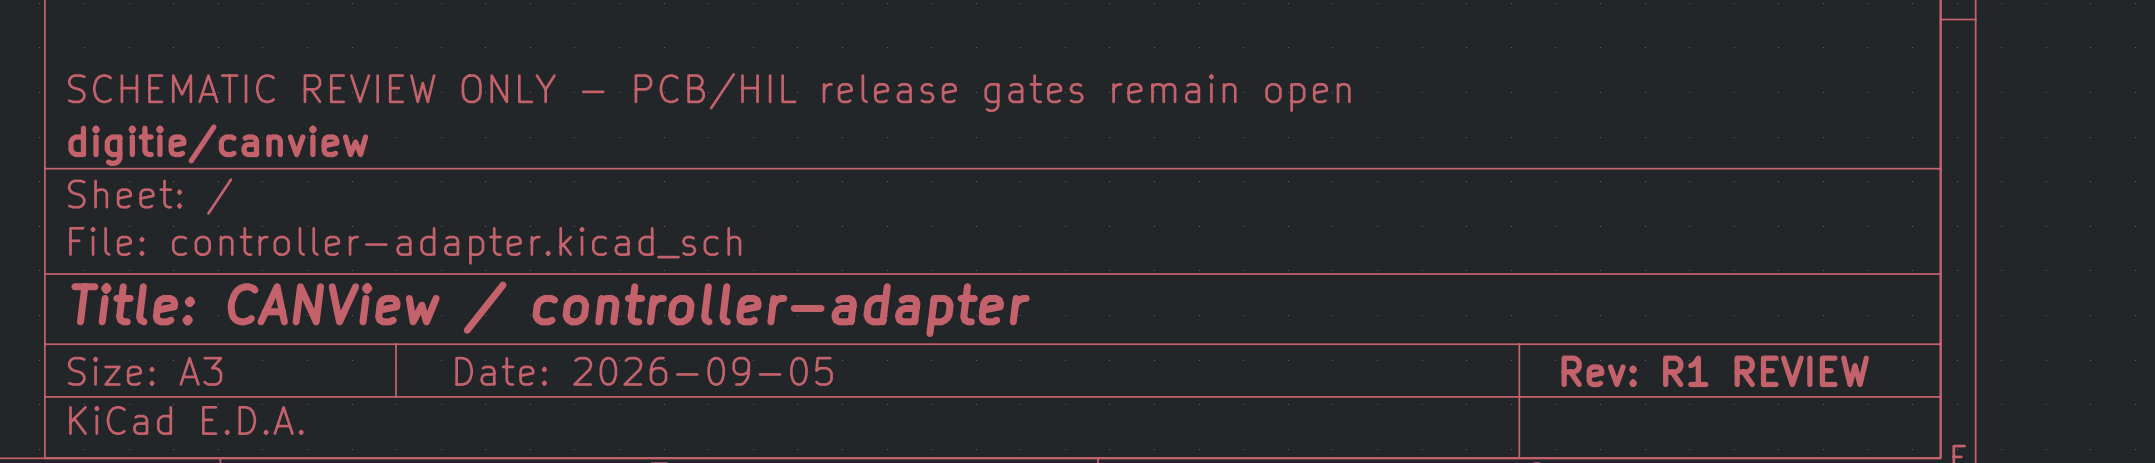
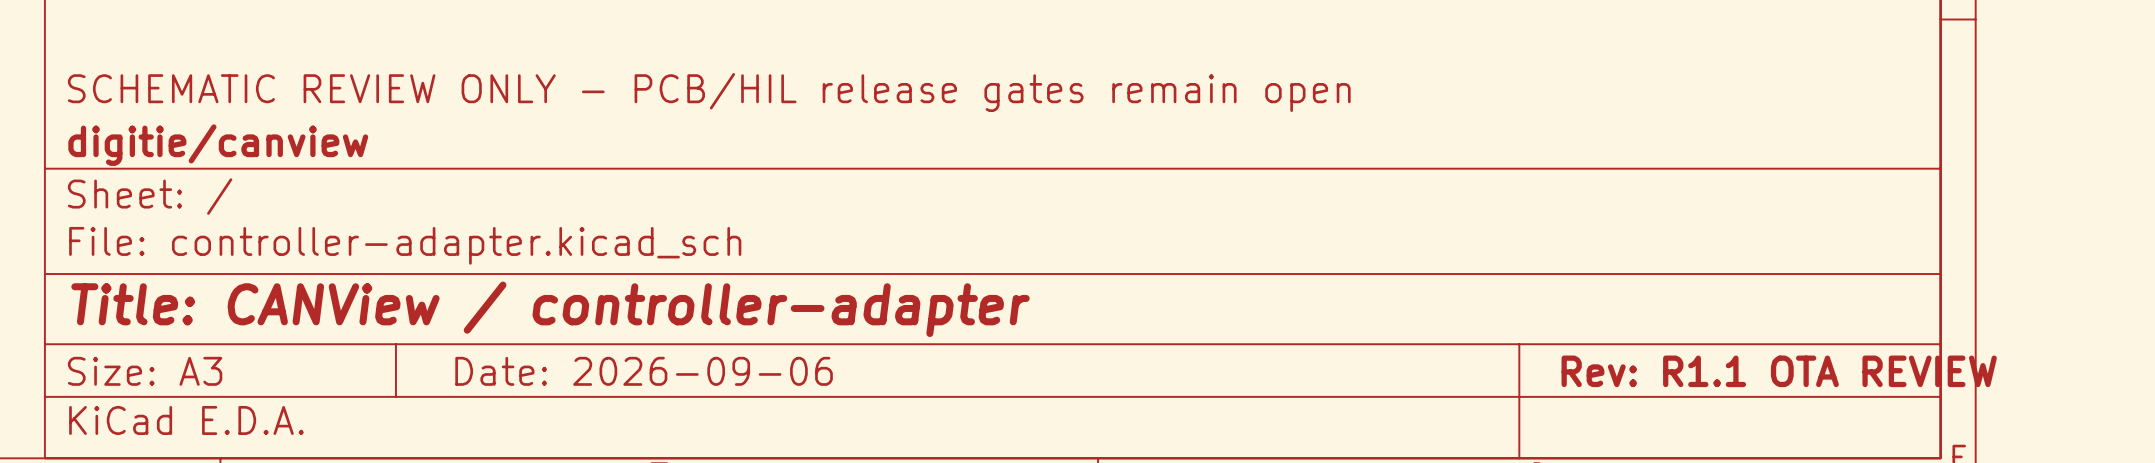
title block: Date: 2026-09-05 (644, 371) -> Date: 2026-09-06 (644, 371)
title block: Rev: R1 REVIEW (1715, 371) -> Rev: R1.1 OTA REVIEW (1779, 371)

